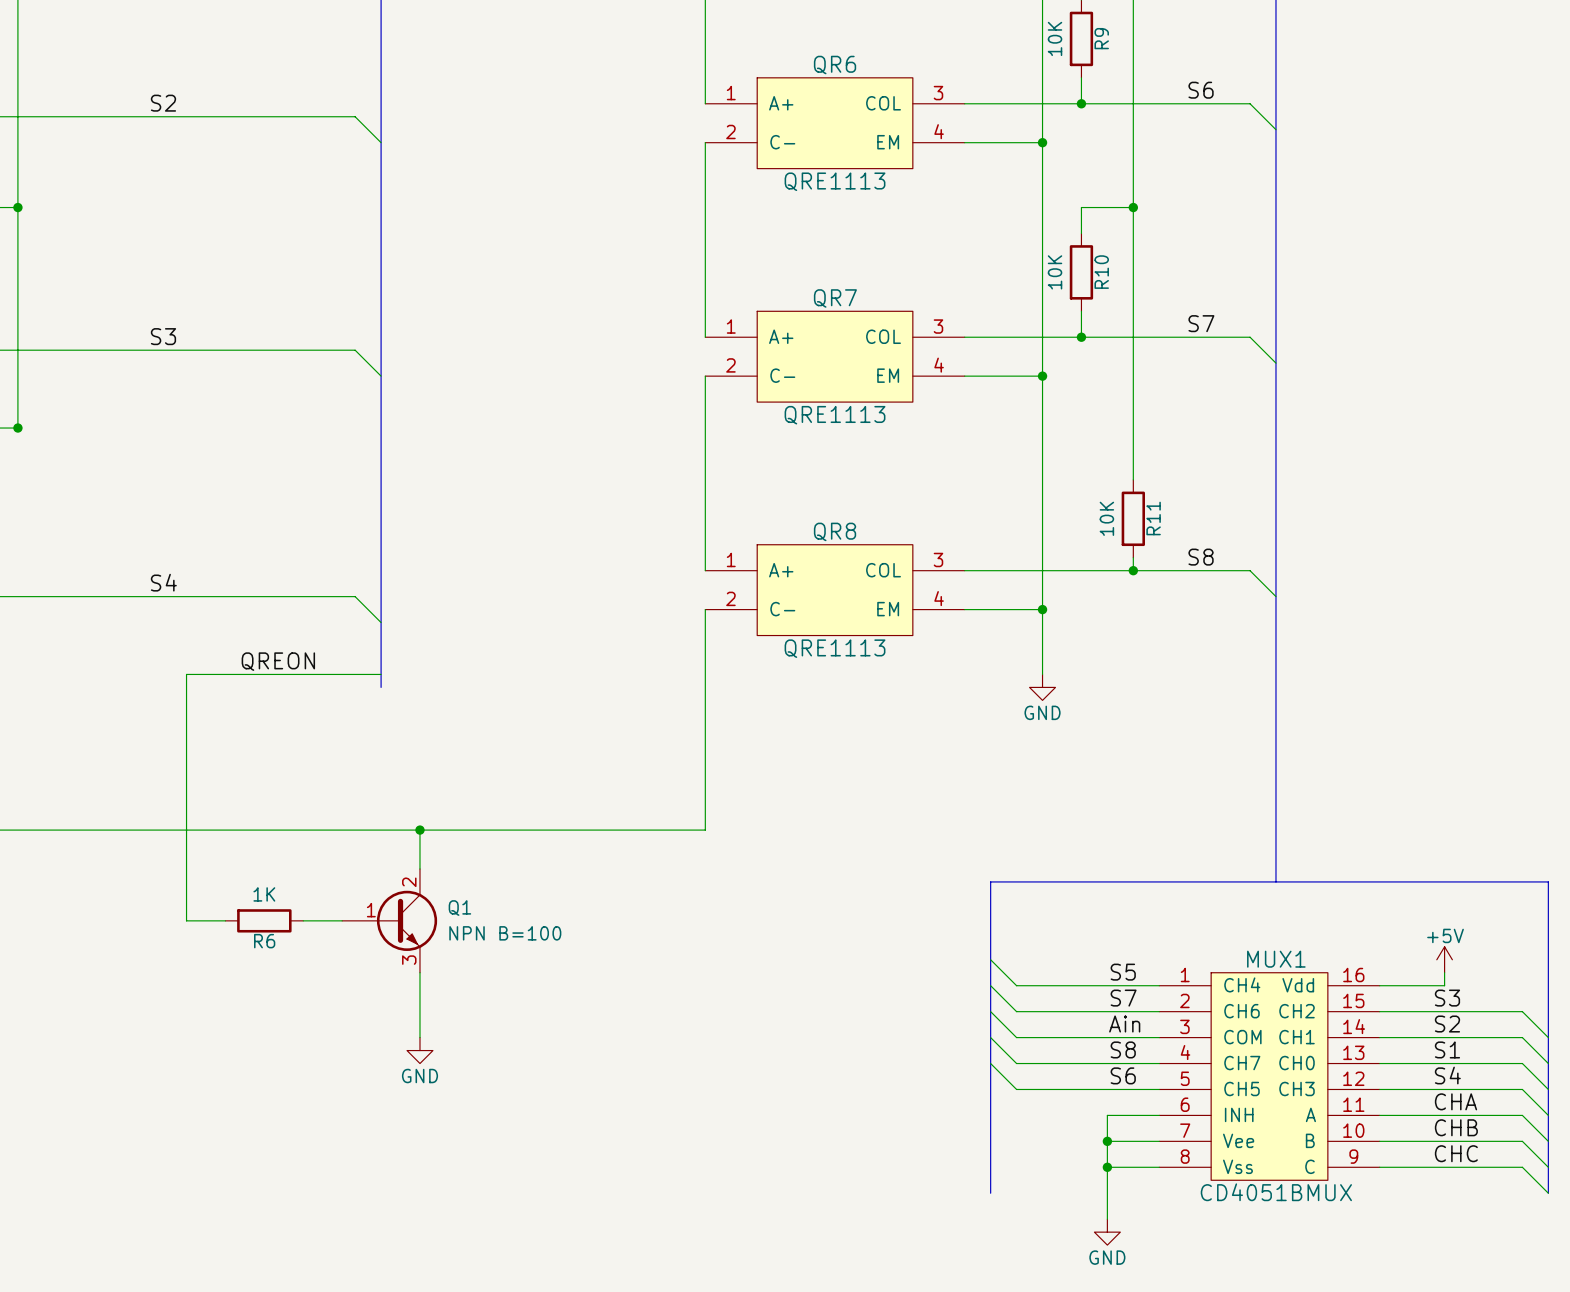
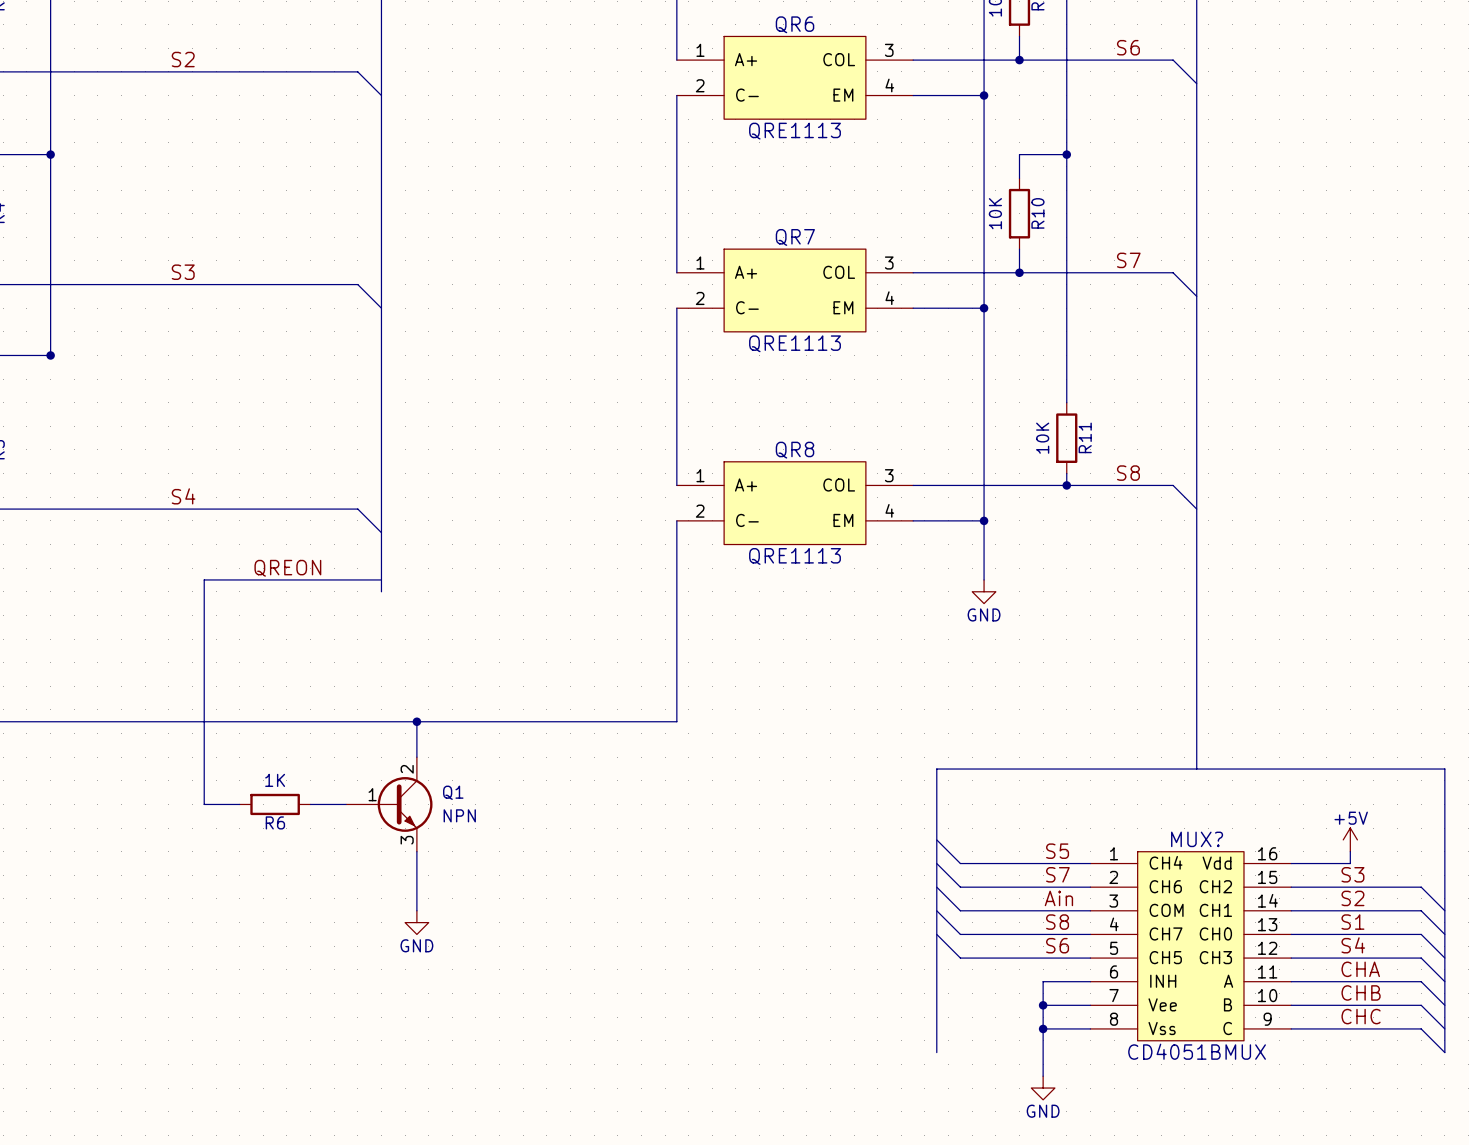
Q1 value: NPN B=100 (505, 933) -> NPN (459, 815)
MUX1 name: MUX1 (1276, 959) -> MUX? (1197, 839)

